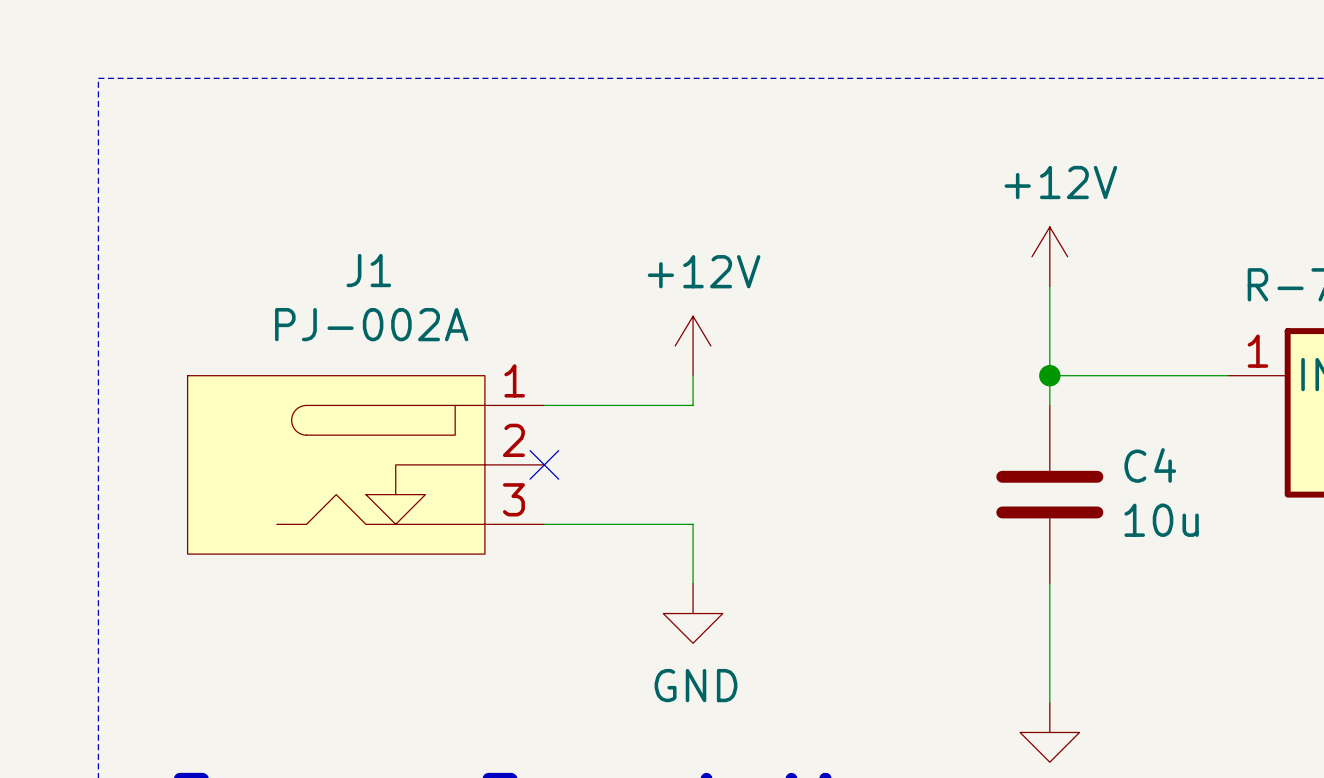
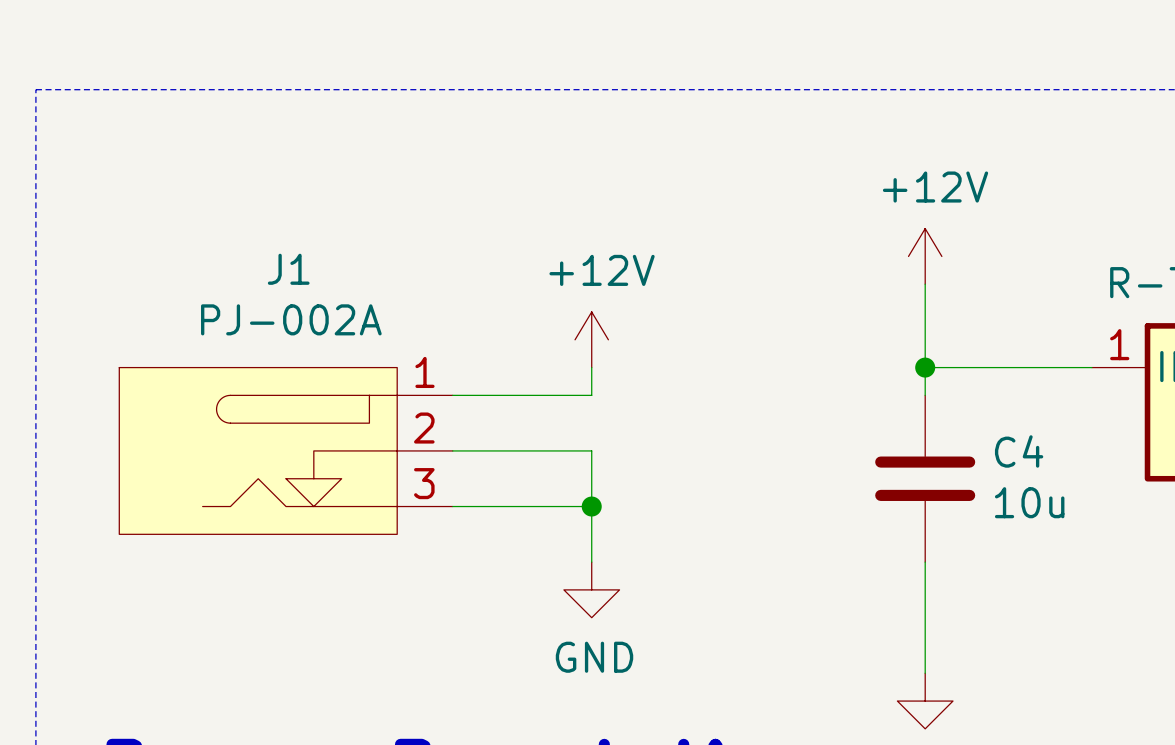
wire: none -> (452, 450) (591, 450) (591, 506)
no-connect mark: (544, 464) -> none
junction: none -> (591, 506)

